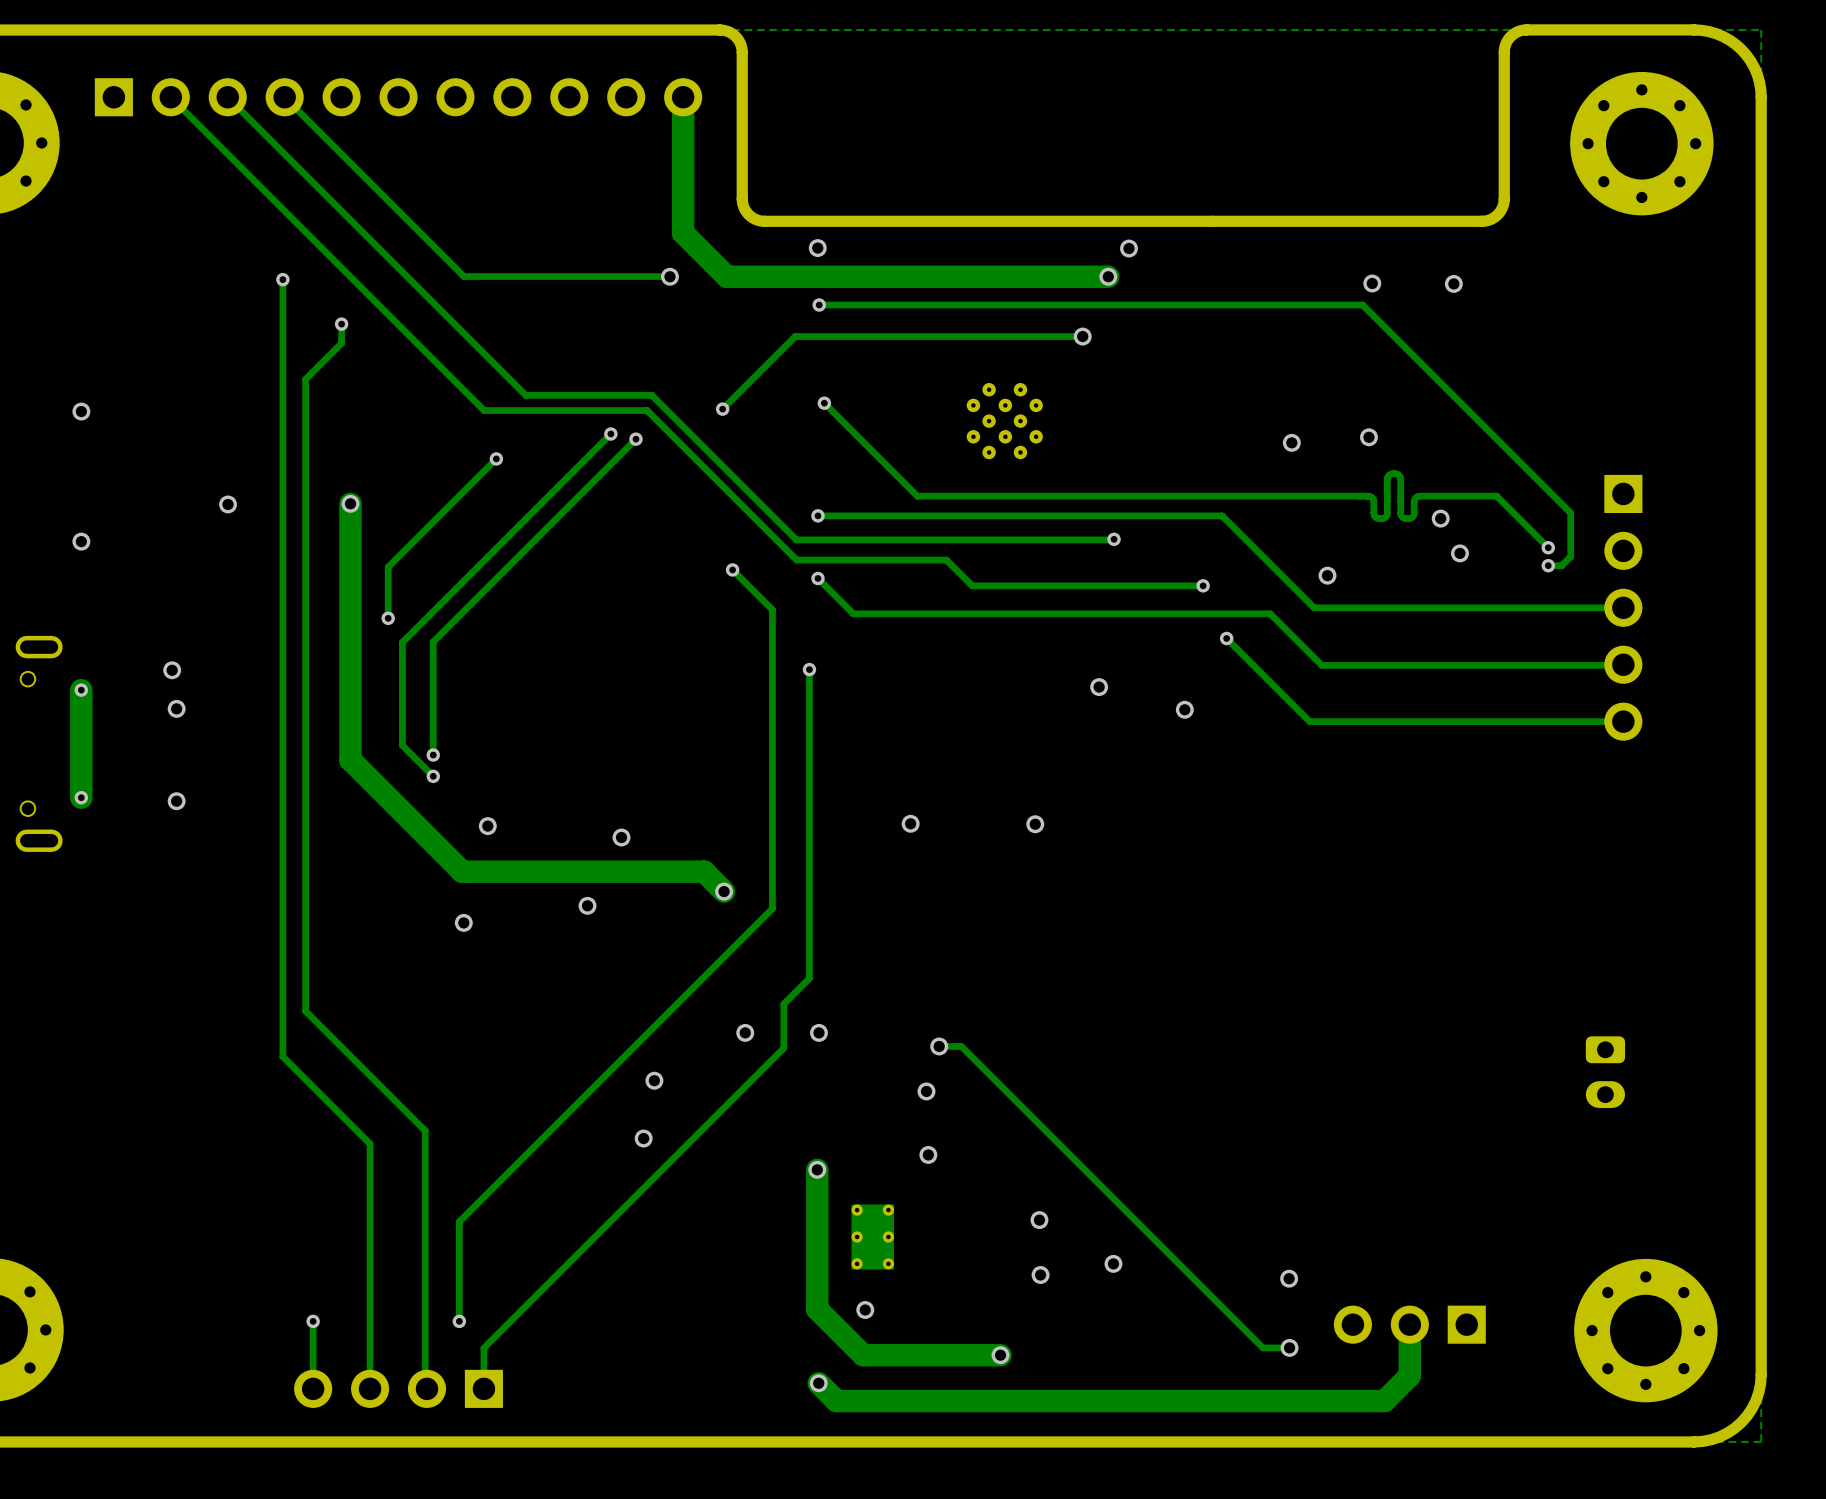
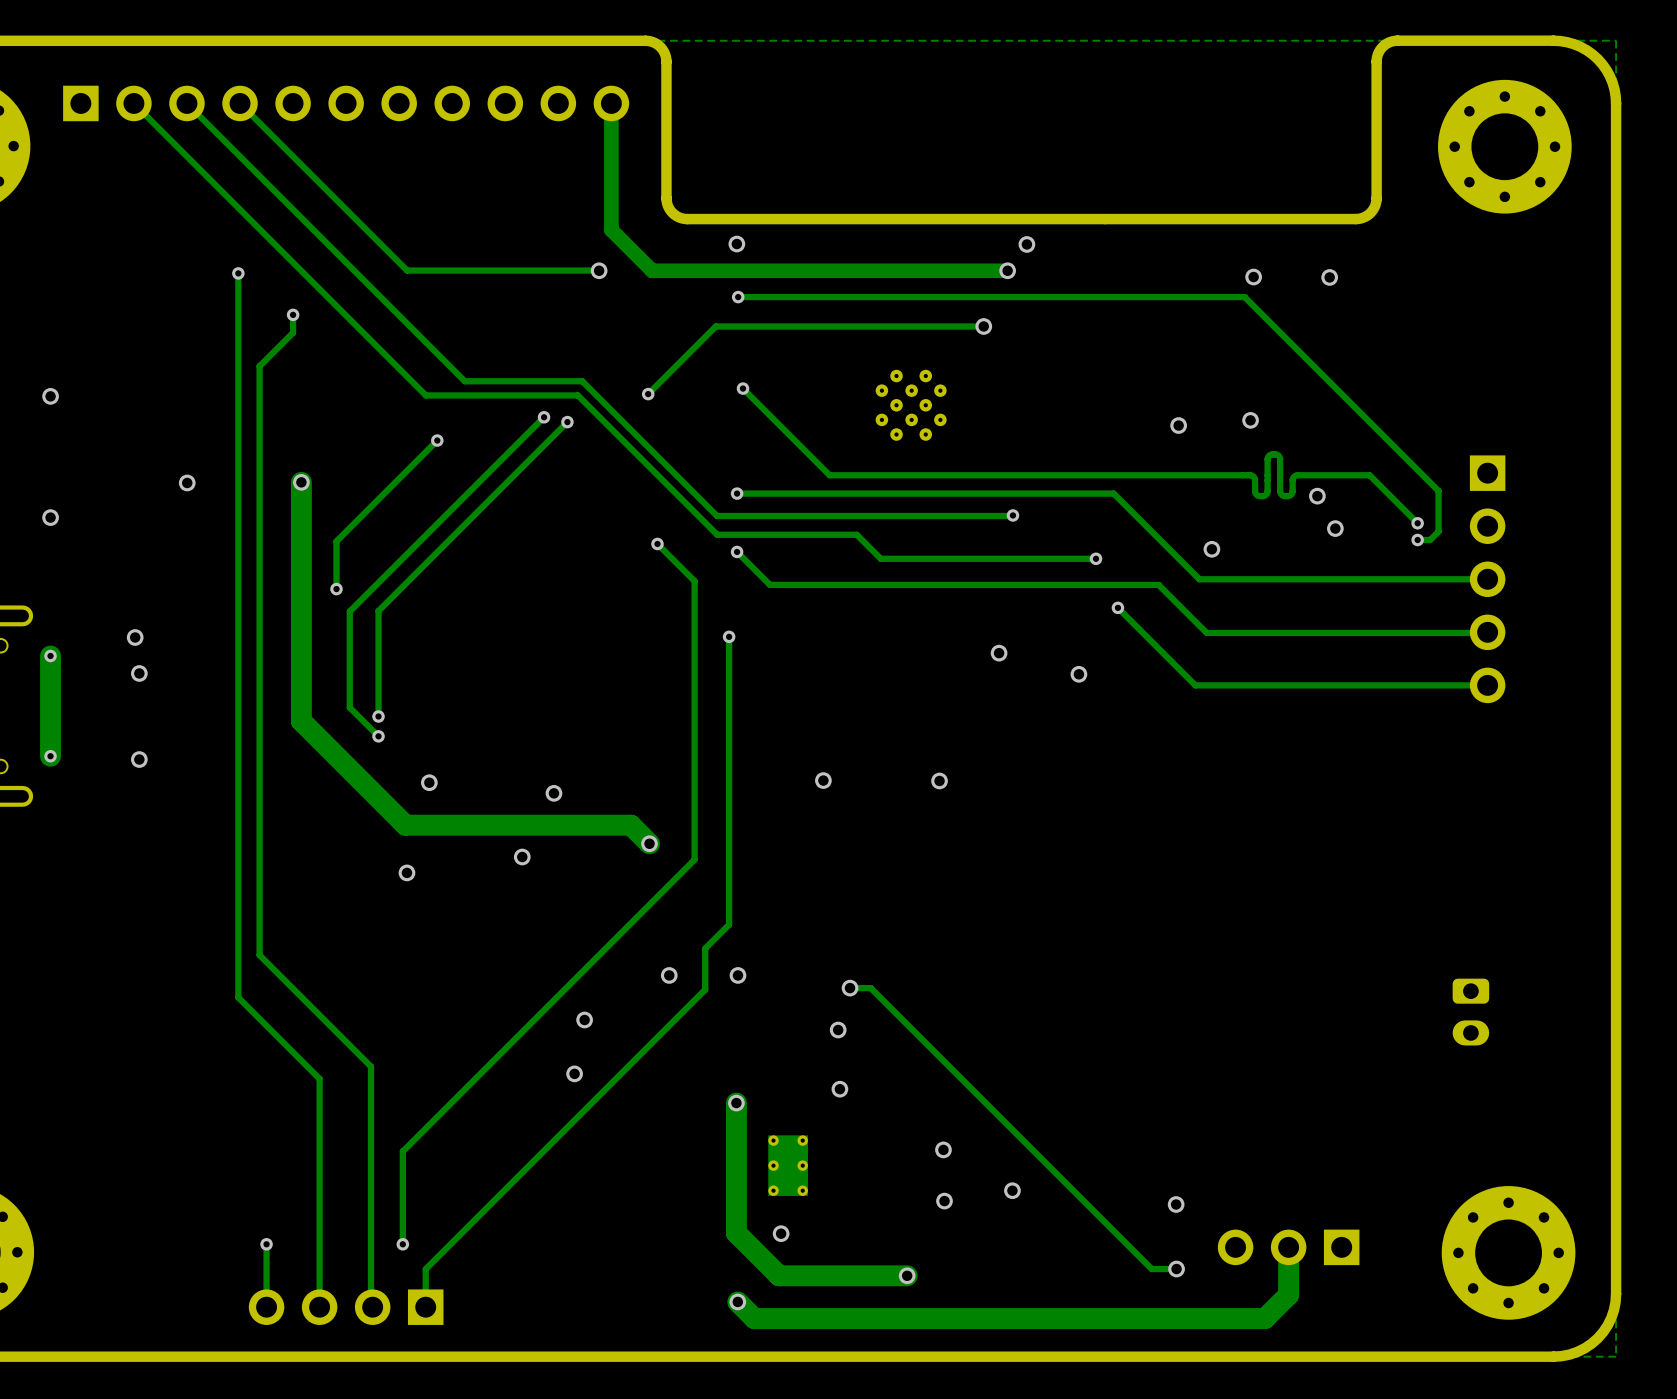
track width: thick (683, 97) (683, 233) (726, 276) (1108, 276) -> thin (611, 103) (611, 229) (652, 270) (1007, 270)

